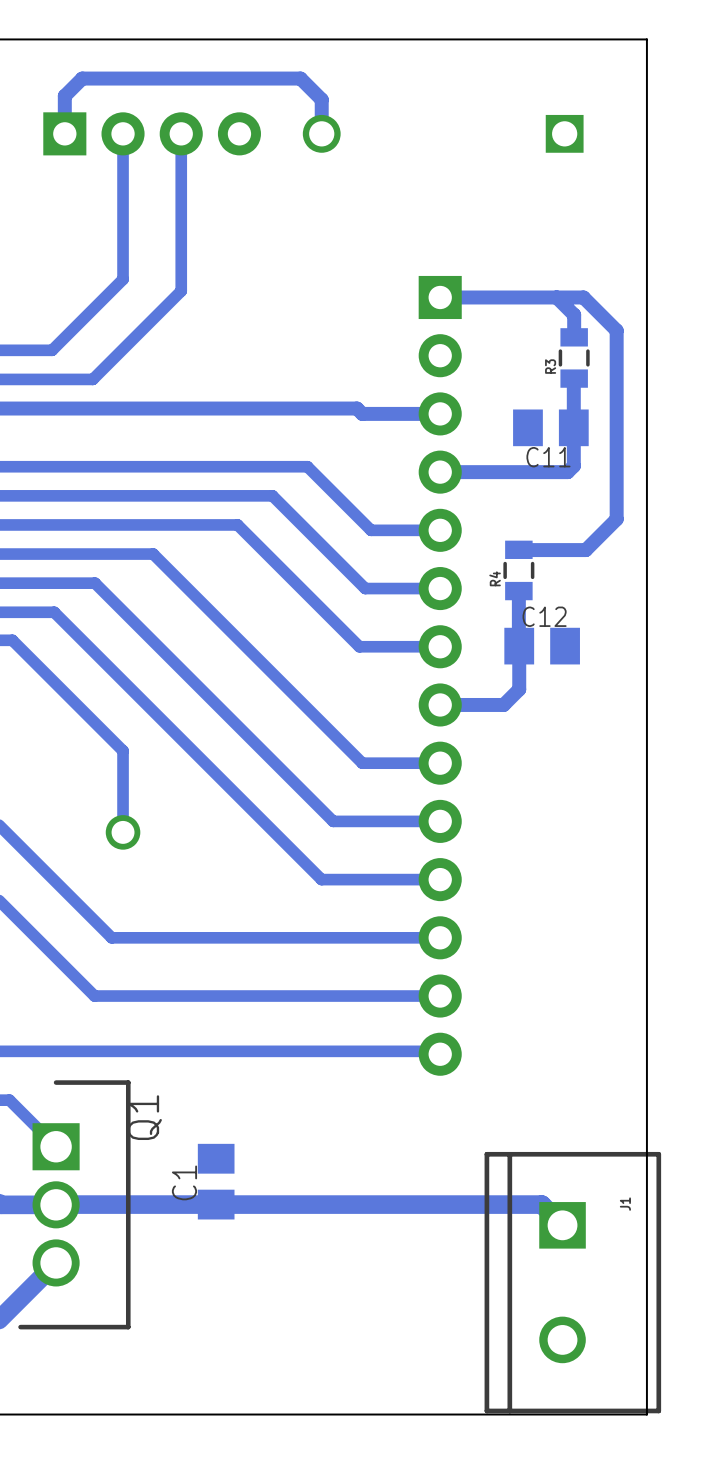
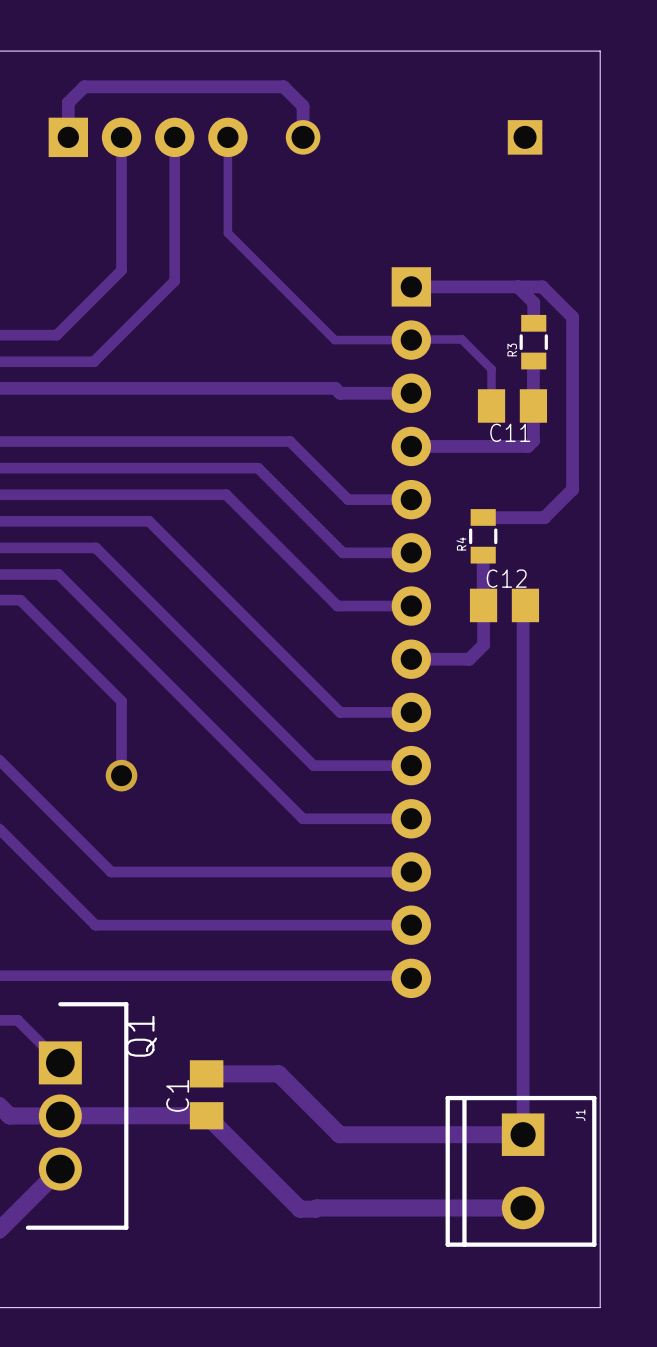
track: none -> (227, 137) (227, 233) (334, 340) (461, 339) (491, 369) (491, 405)
track: none -> (525, 605) (523, 607) (523, 1134) (339, 1134) (278, 1073) (206, 1073)
J1 footprint: [484, 1151, 662, 1414] -> [445, 1095, 597, 1247]
track: (216, 1204) (541, 1204) (562, 1225) -> (206, 1115) (300, 1209) (523, 1207)

